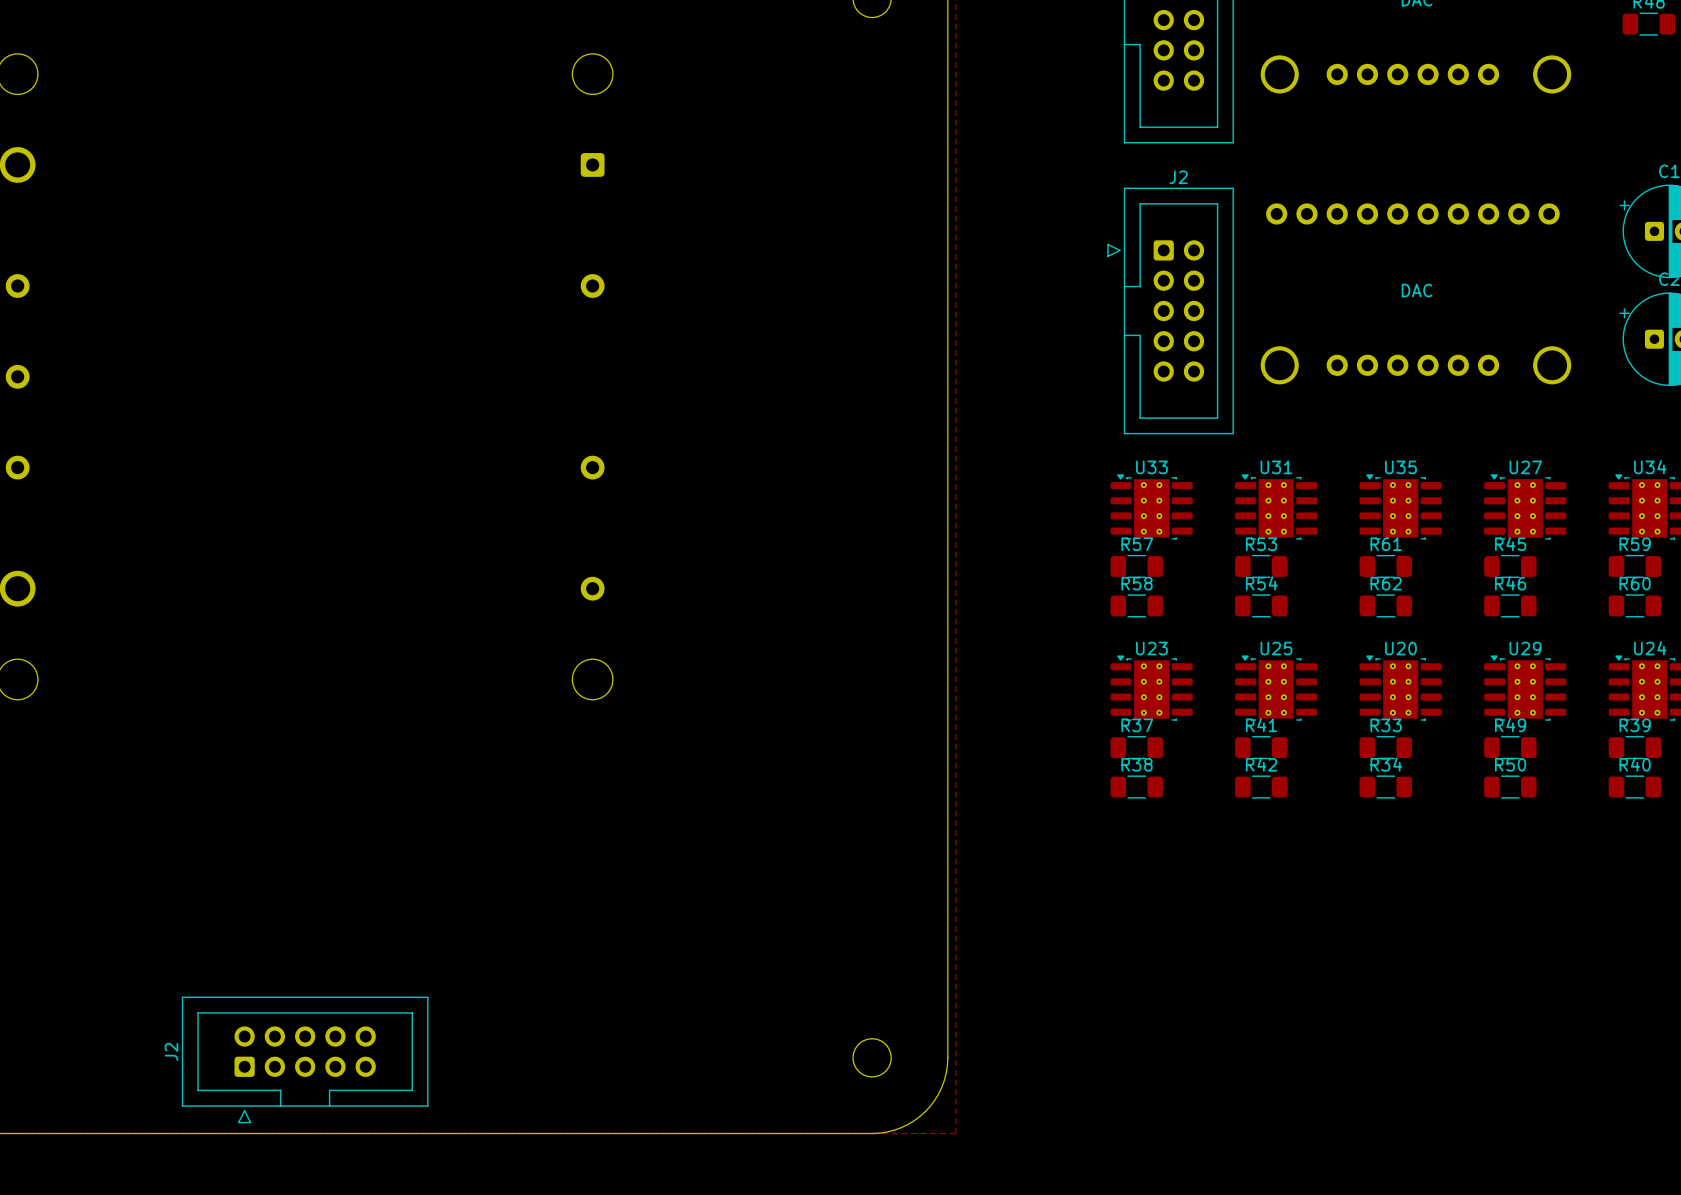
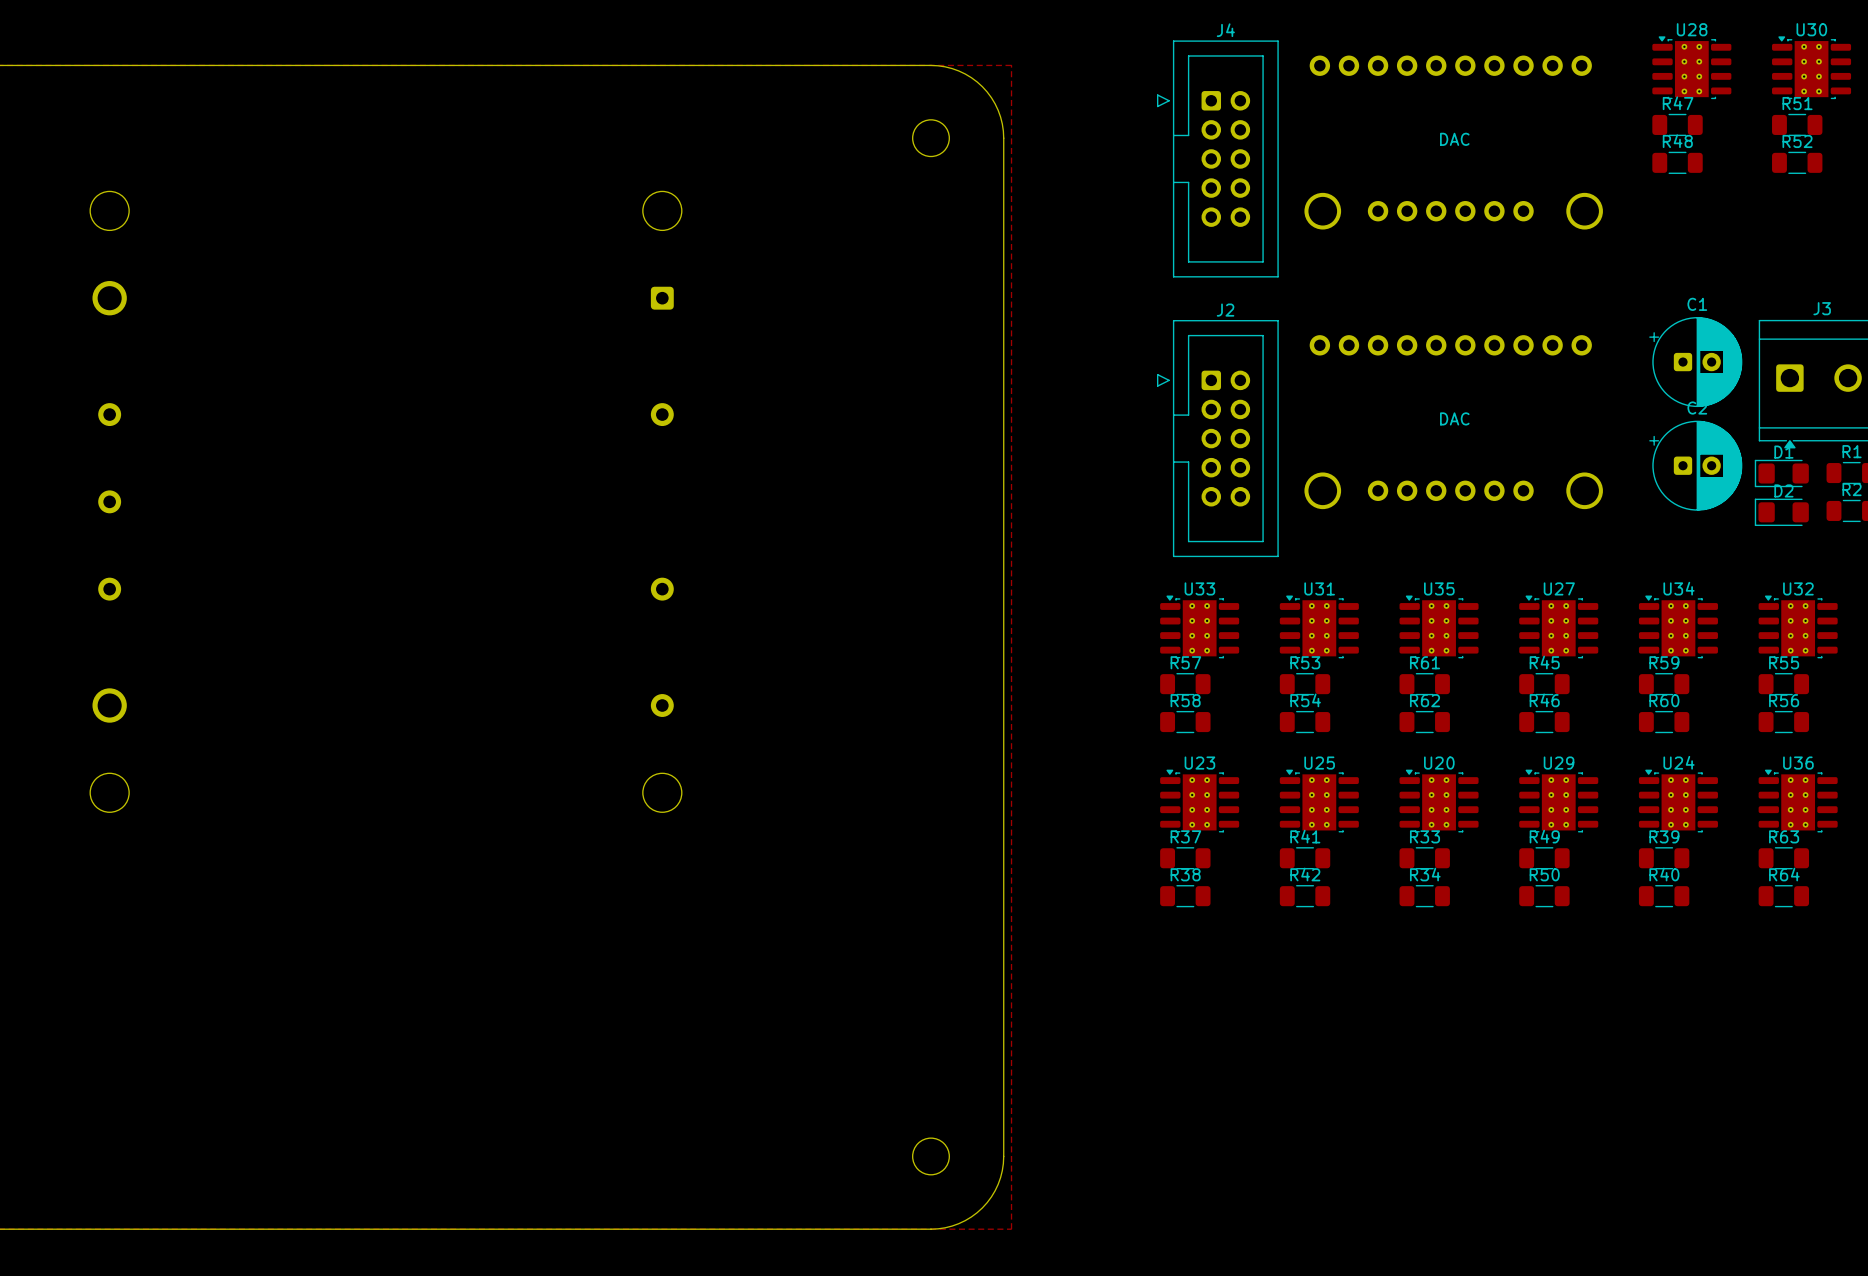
J2: (305, 1059) -> none

